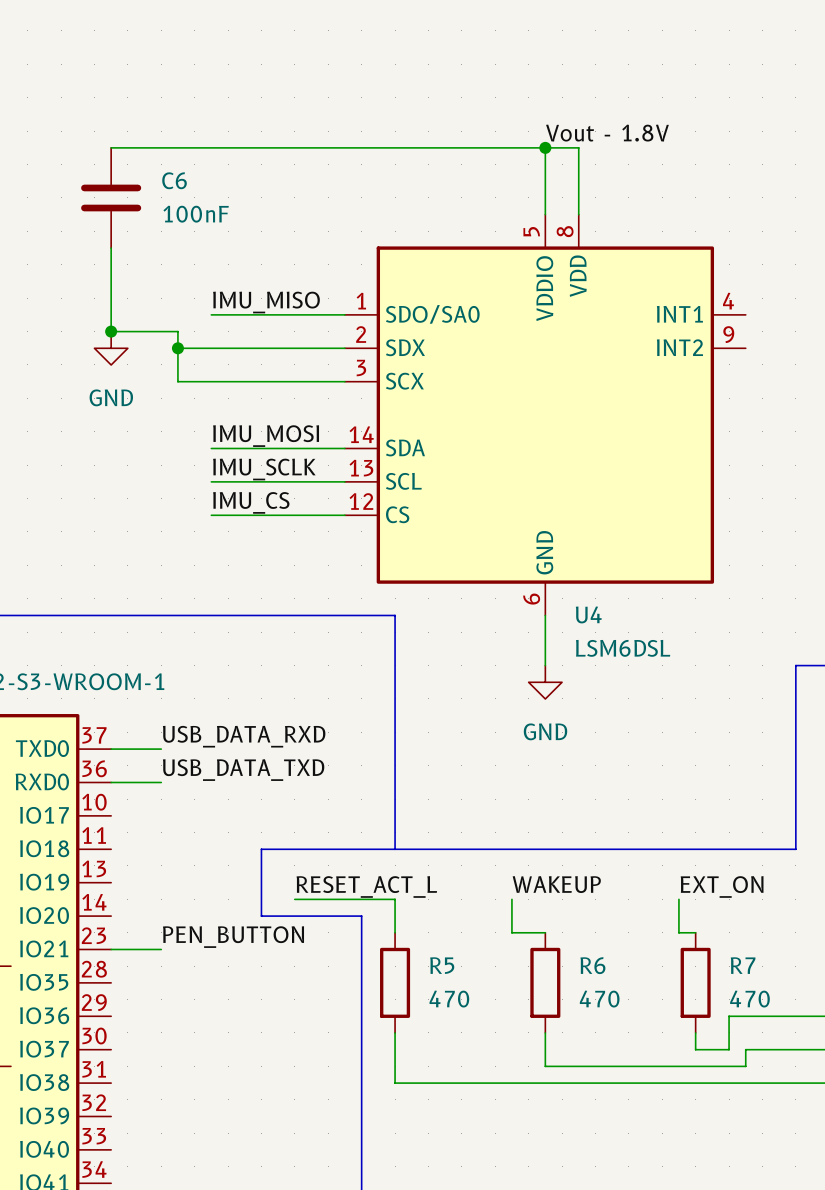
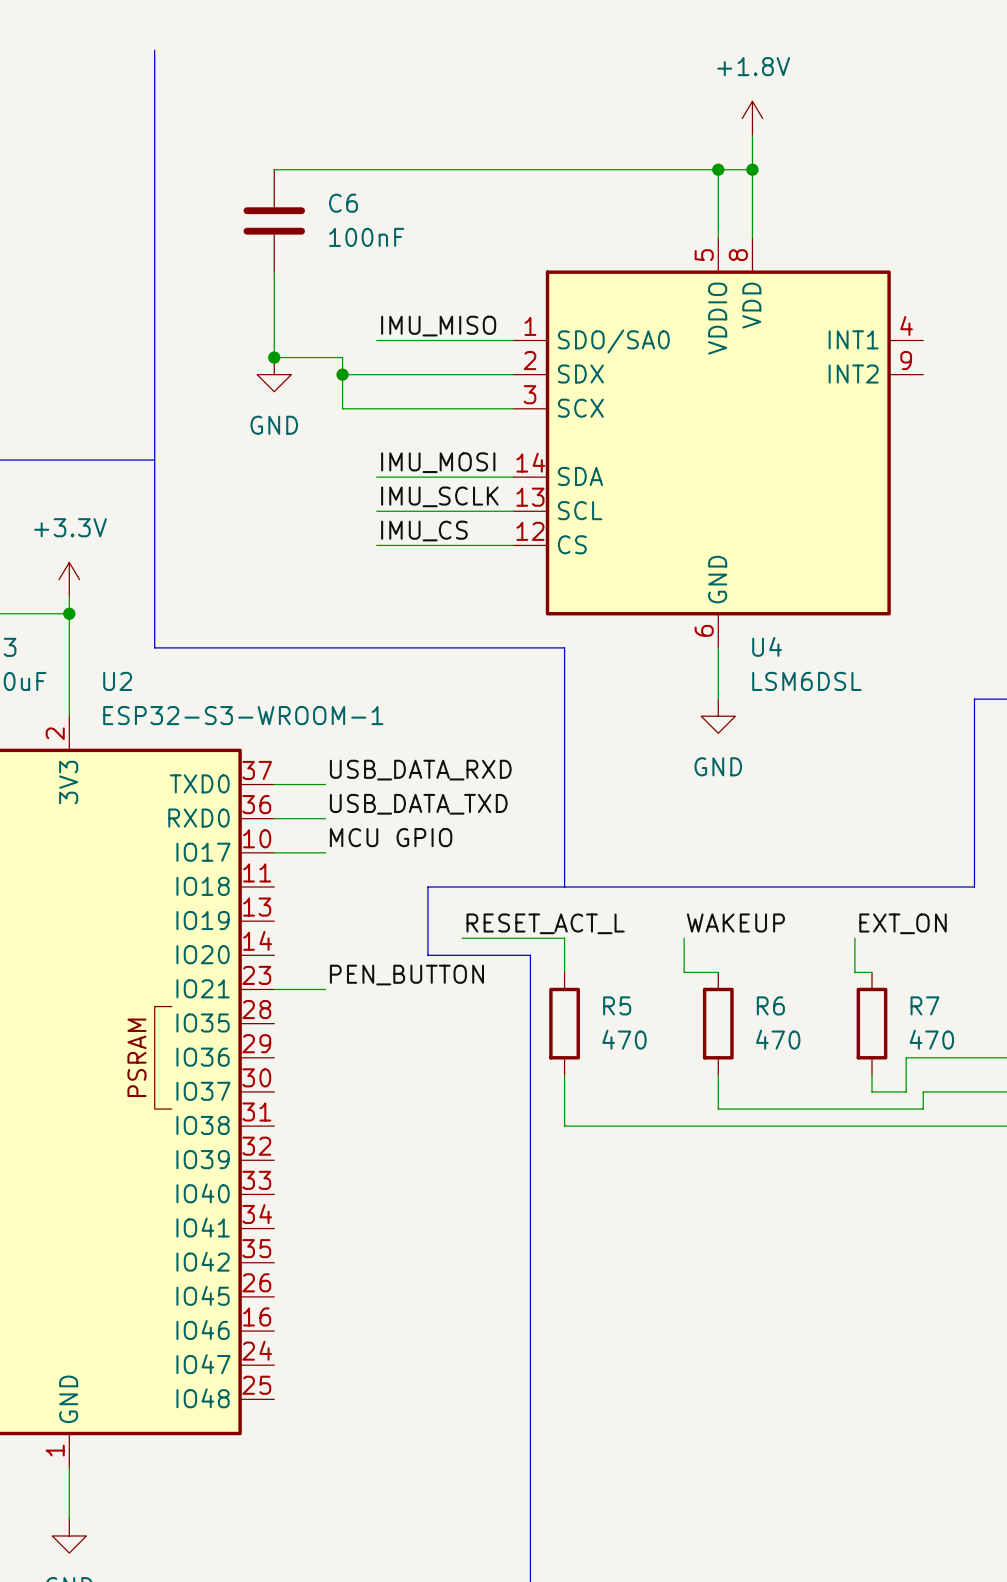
power symbol: none -> +1.8V (752, 118)
wire: none -> (752, 135) (752, 169)
label: Vout - 1.8V (607, 133) -> none
junction: none -> (752, 169)
label: none -> MCU GPIO (391, 837)
wire: none -> (274, 852) (325, 852)

